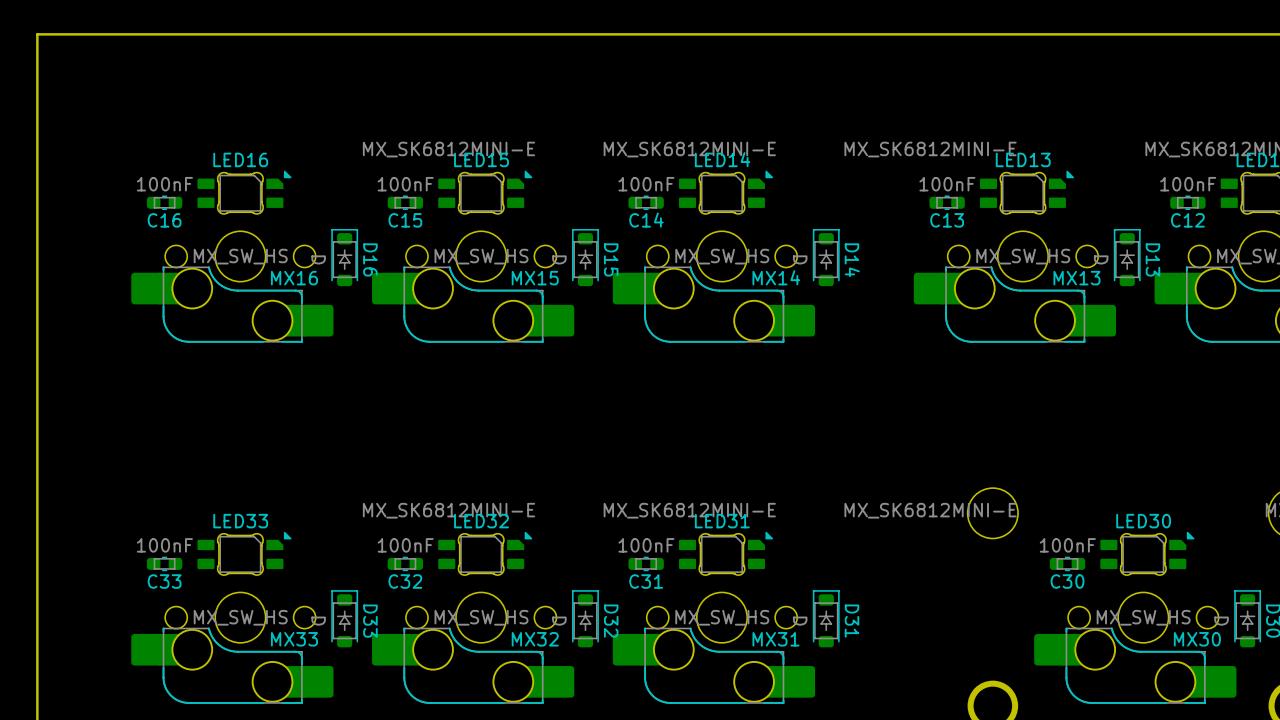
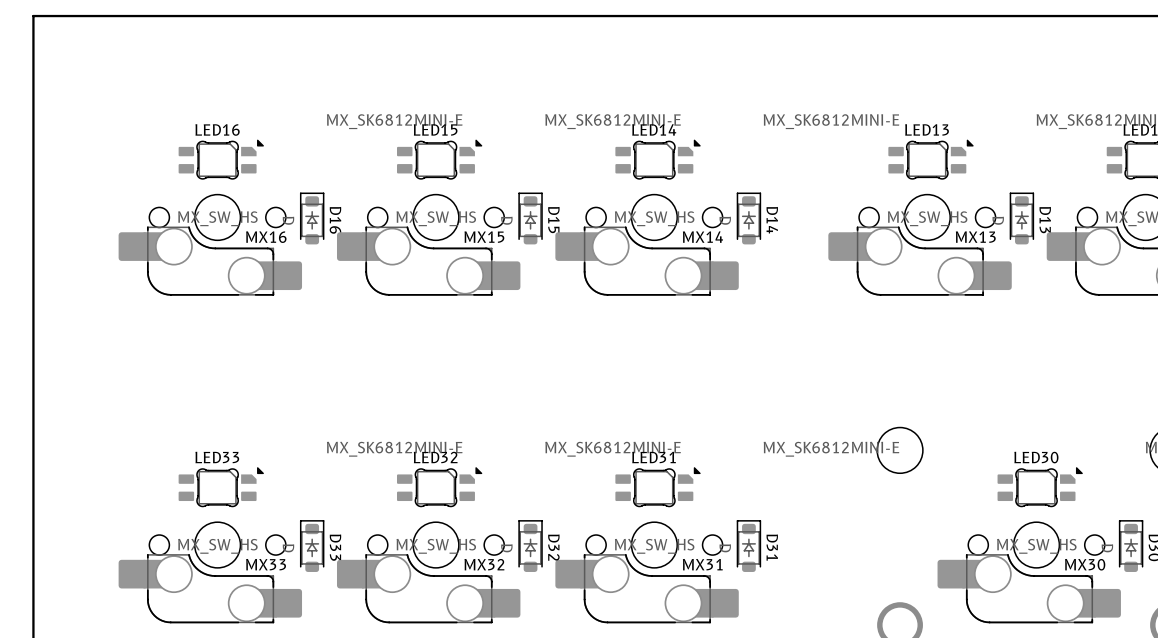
C16: 100nF (164, 202) -> none
C15: 100nF (405, 202) -> none
C14: 100nF (646, 202) -> none
C13: 100nF (947, 202) -> none
C12: 100nF (1187, 202) -> none
C33: 100nF (164, 563) -> none
C32: 100nF (405, 563) -> none
C31: 100nF (646, 563) -> none
C30: 100nF (1067, 563) -> none

